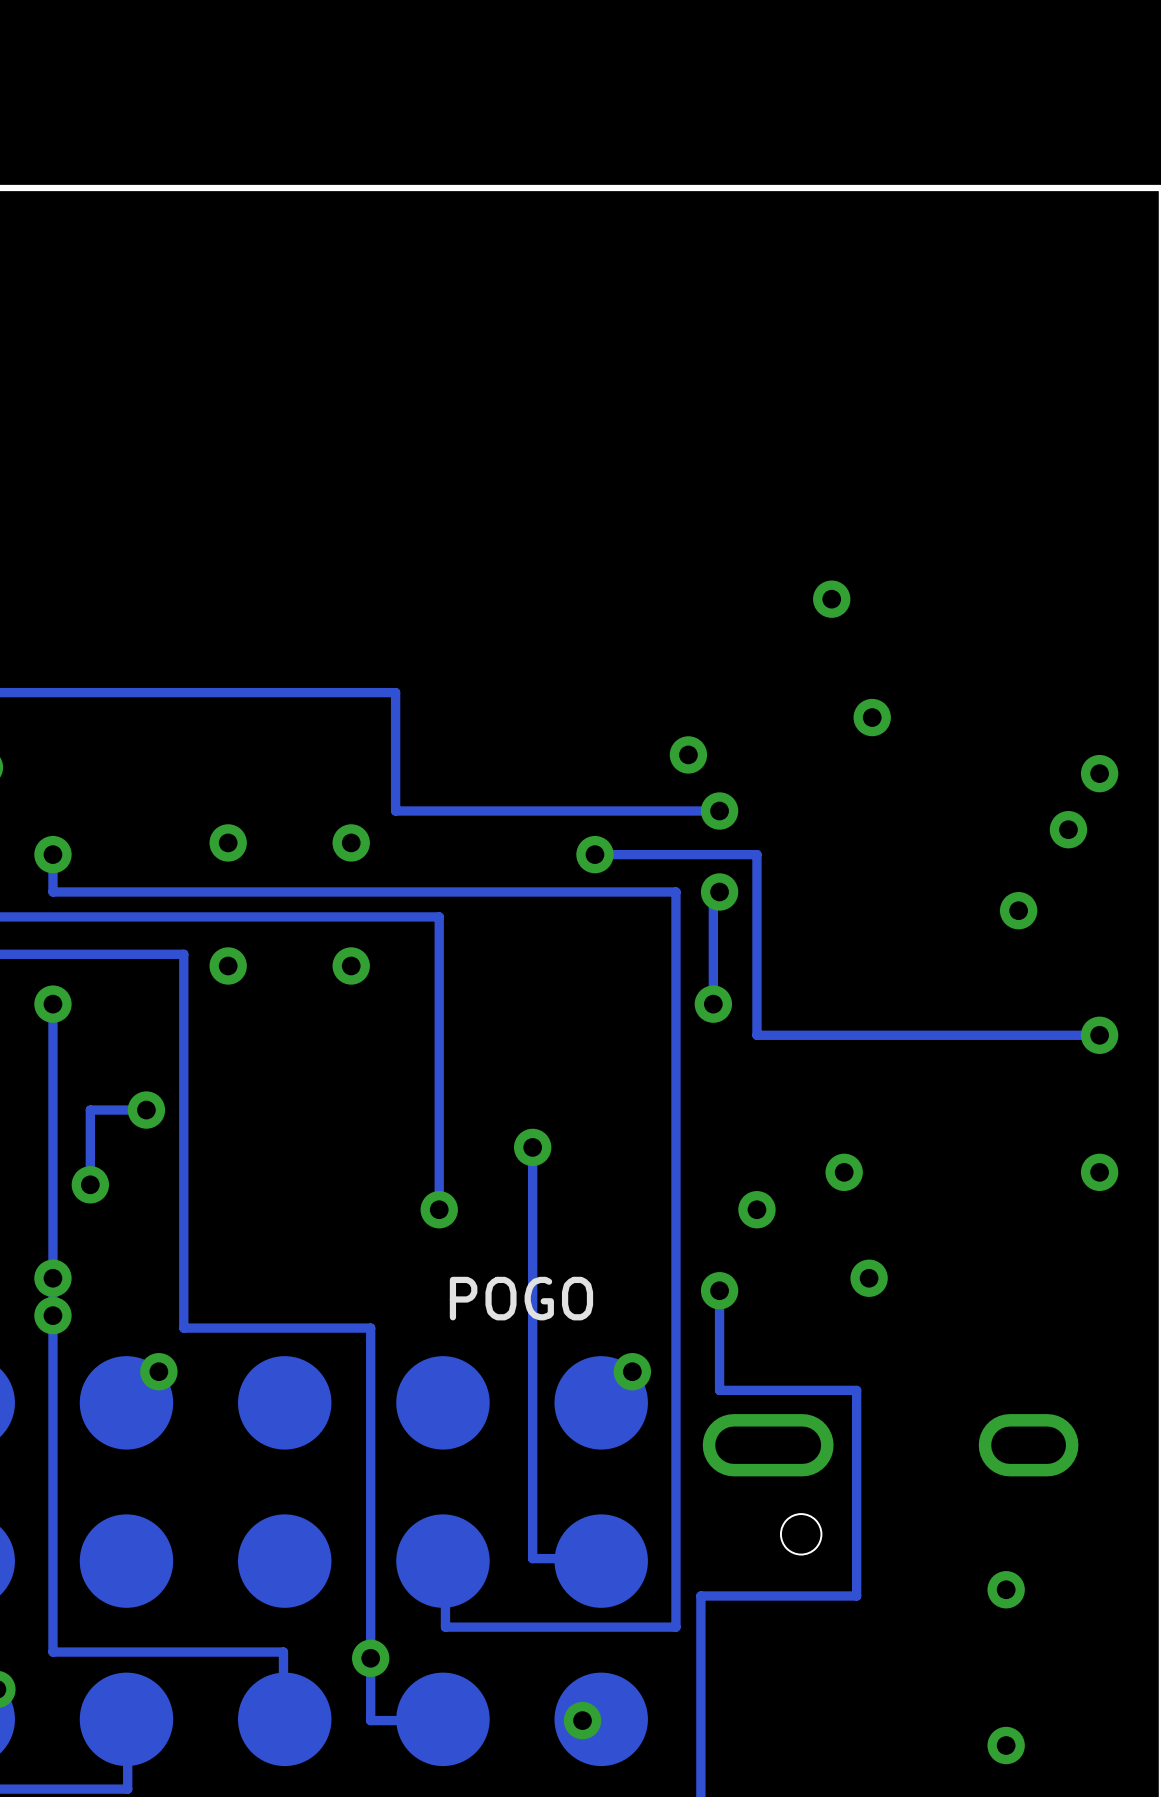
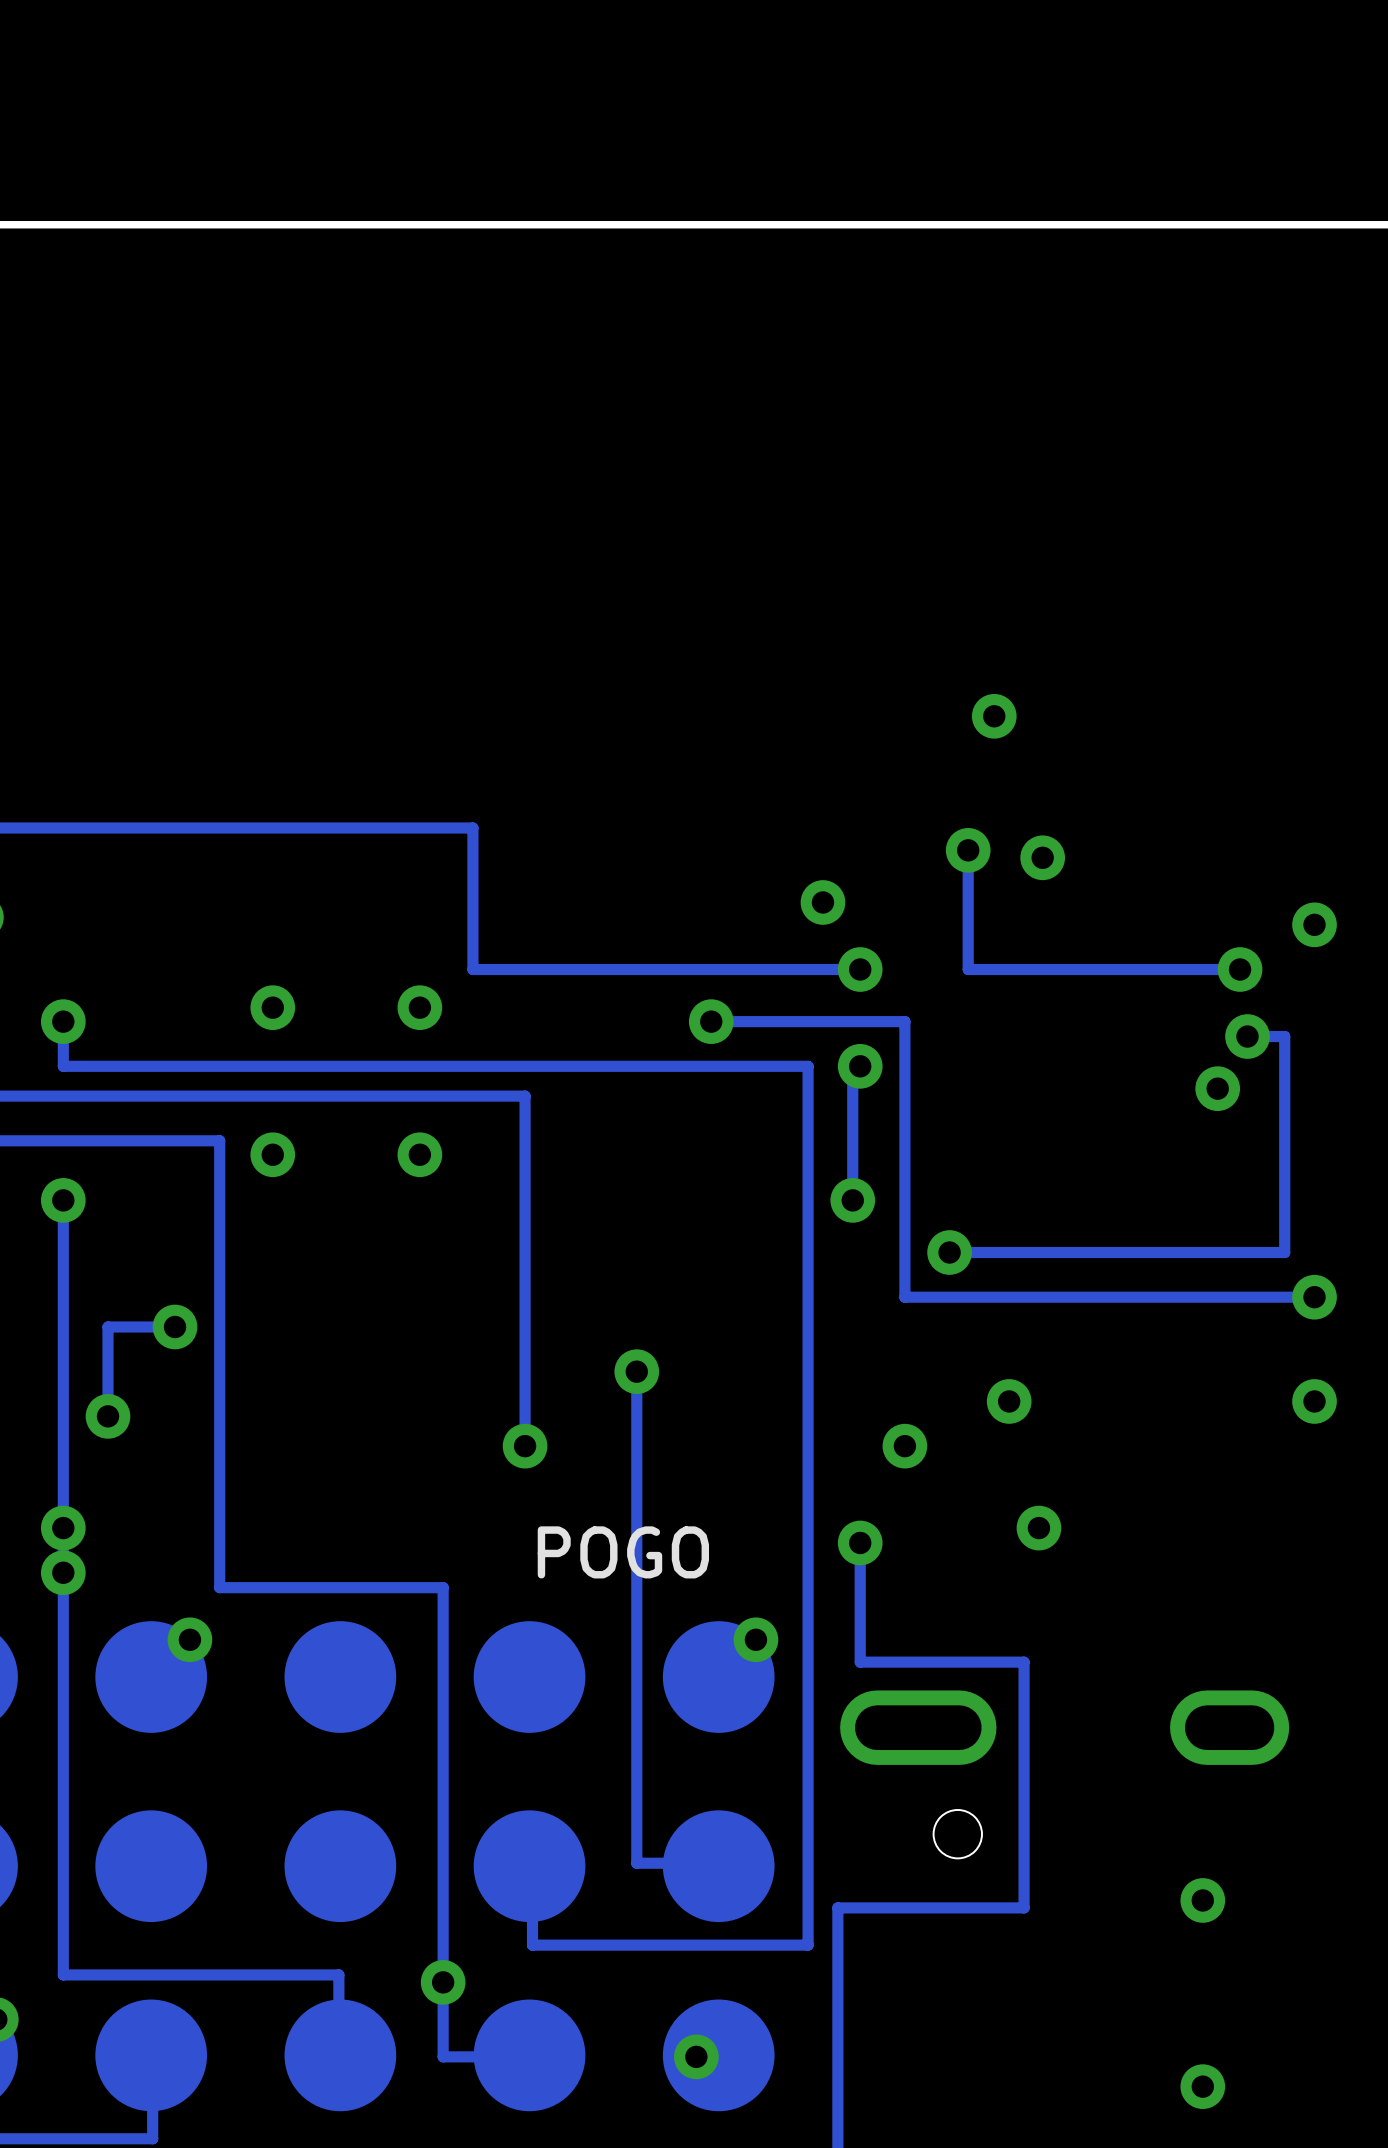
track: none -> (968, 850) (968, 969) (1240, 969)
via: none -> (968, 850)
via position: (1068, 829) -> (1240, 969)
track: none -> (1247, 1036) (1284, 1036) (1284, 1252) (949, 1252)
via: none -> (1247, 1036)
track: (1099, 1035) (756, 1035) -> (1314, 1297) (904, 1297) (904, 1237)
via position: (1099, 1035) -> (1314, 1297)
via: none -> (949, 1252)

